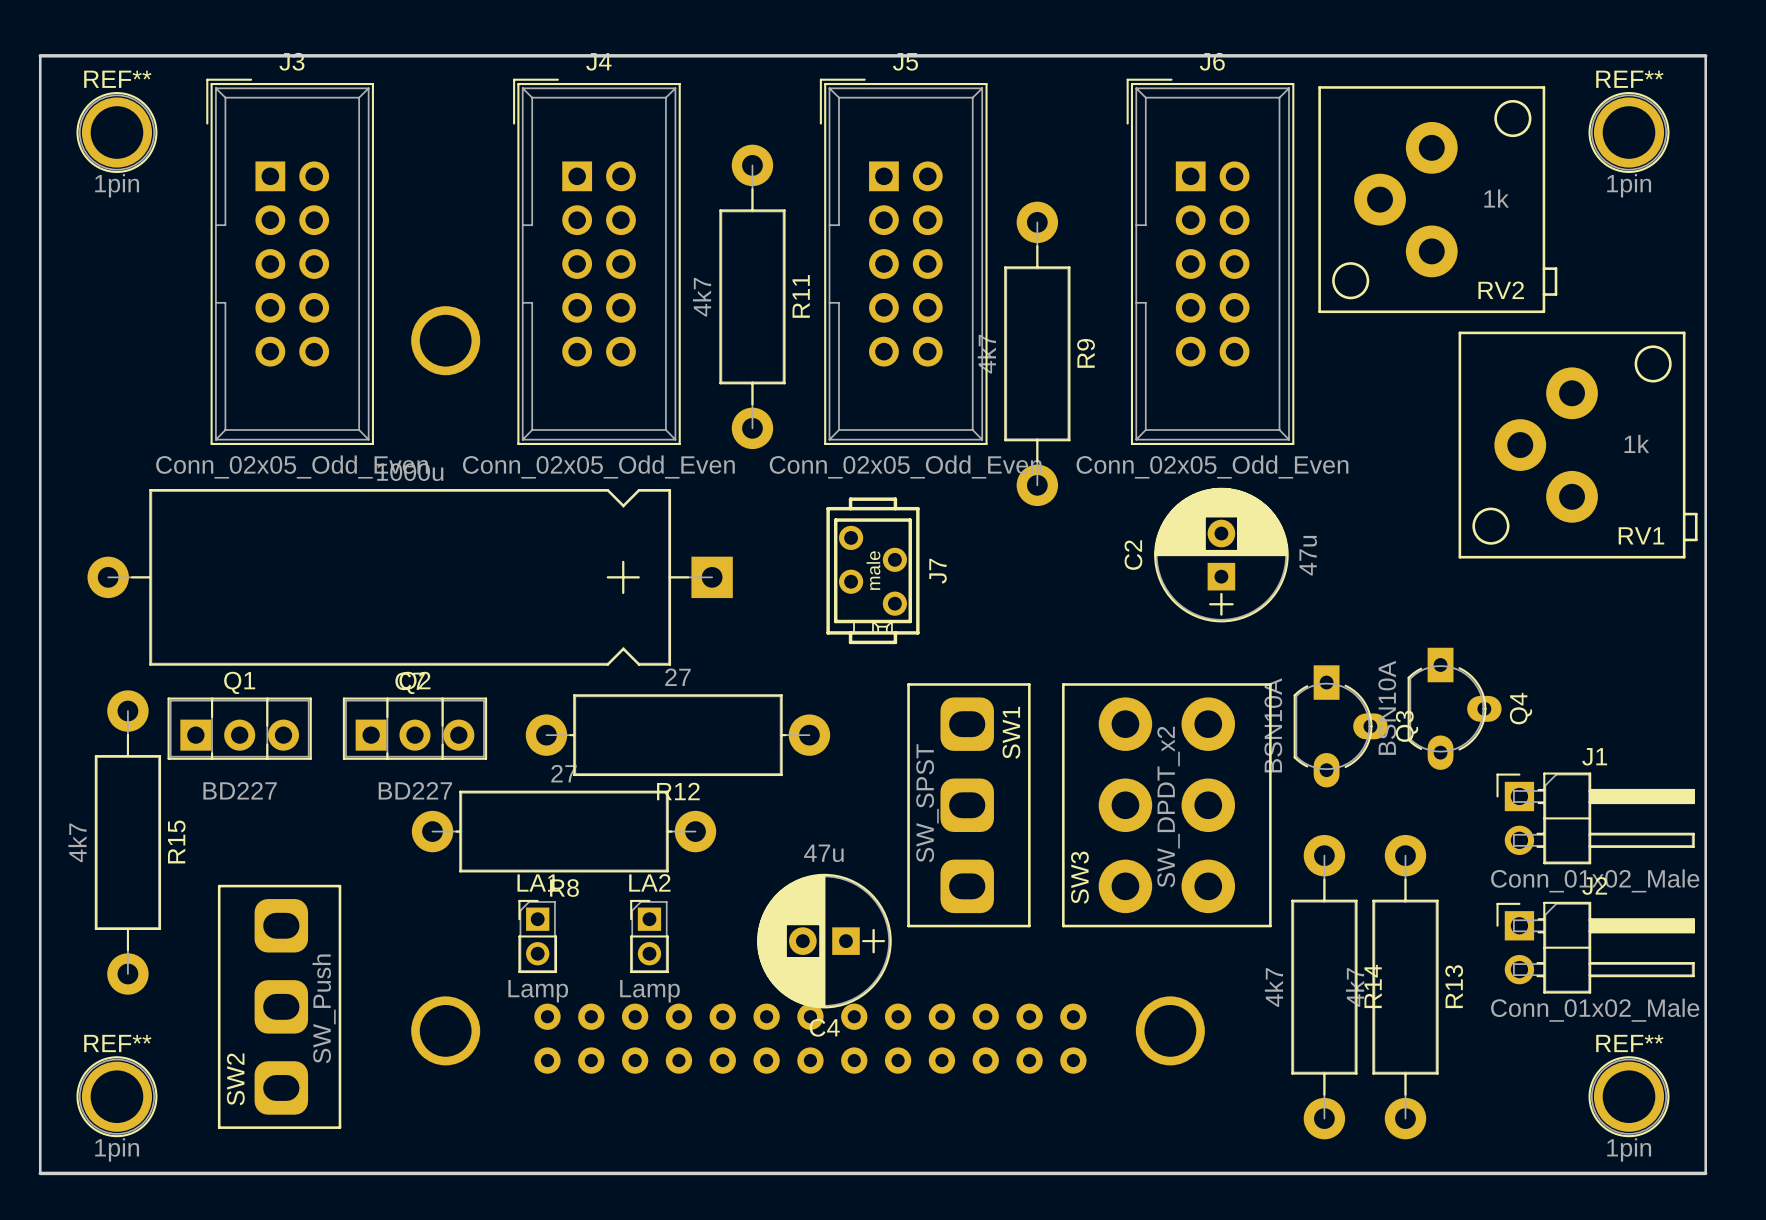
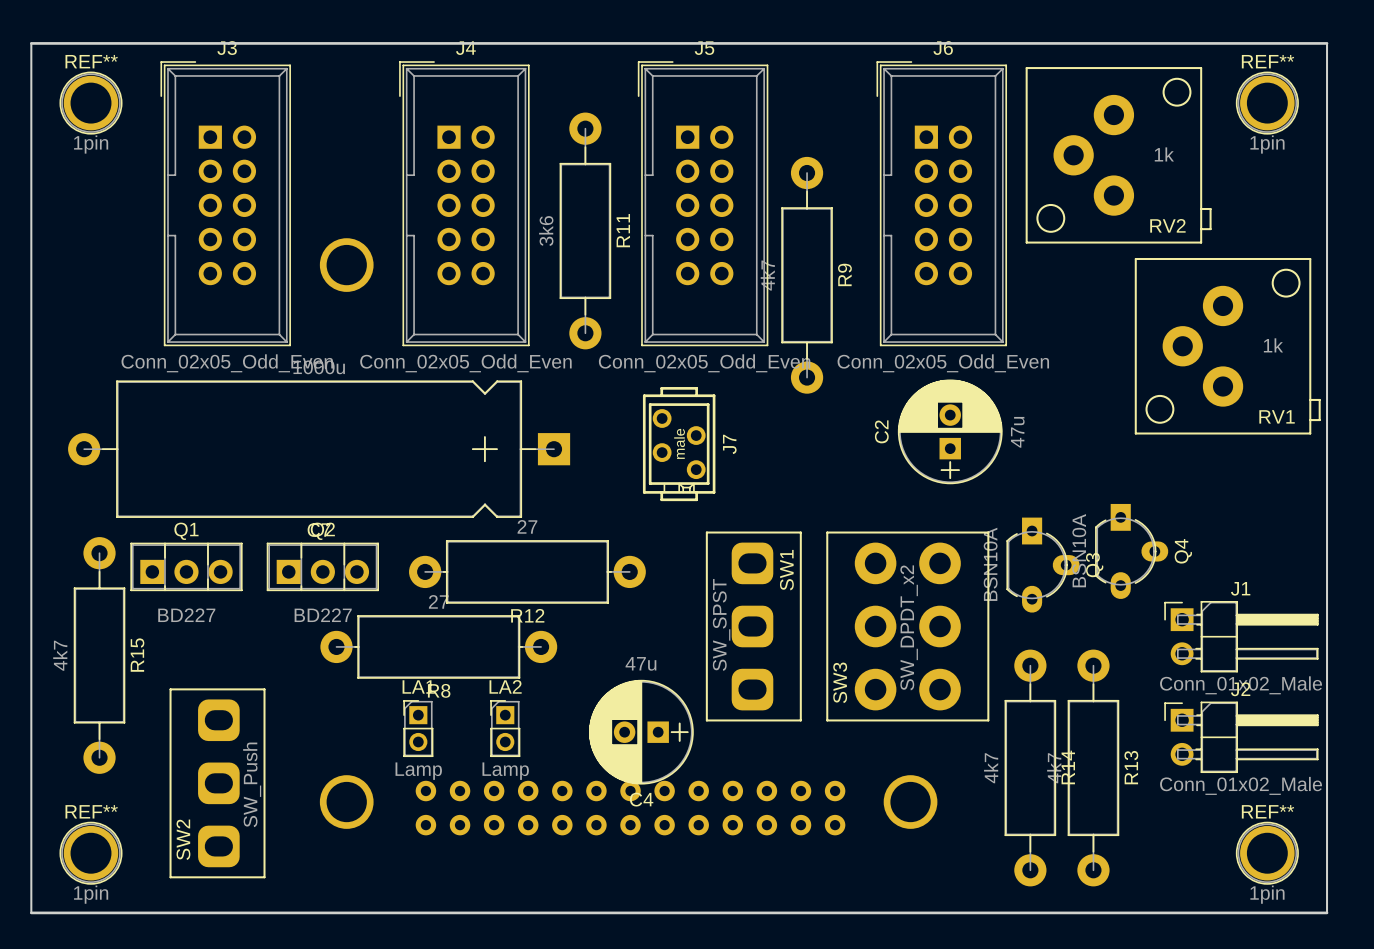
R11 value: 4k7 (702, 297) -> 3k6 (546, 231)

